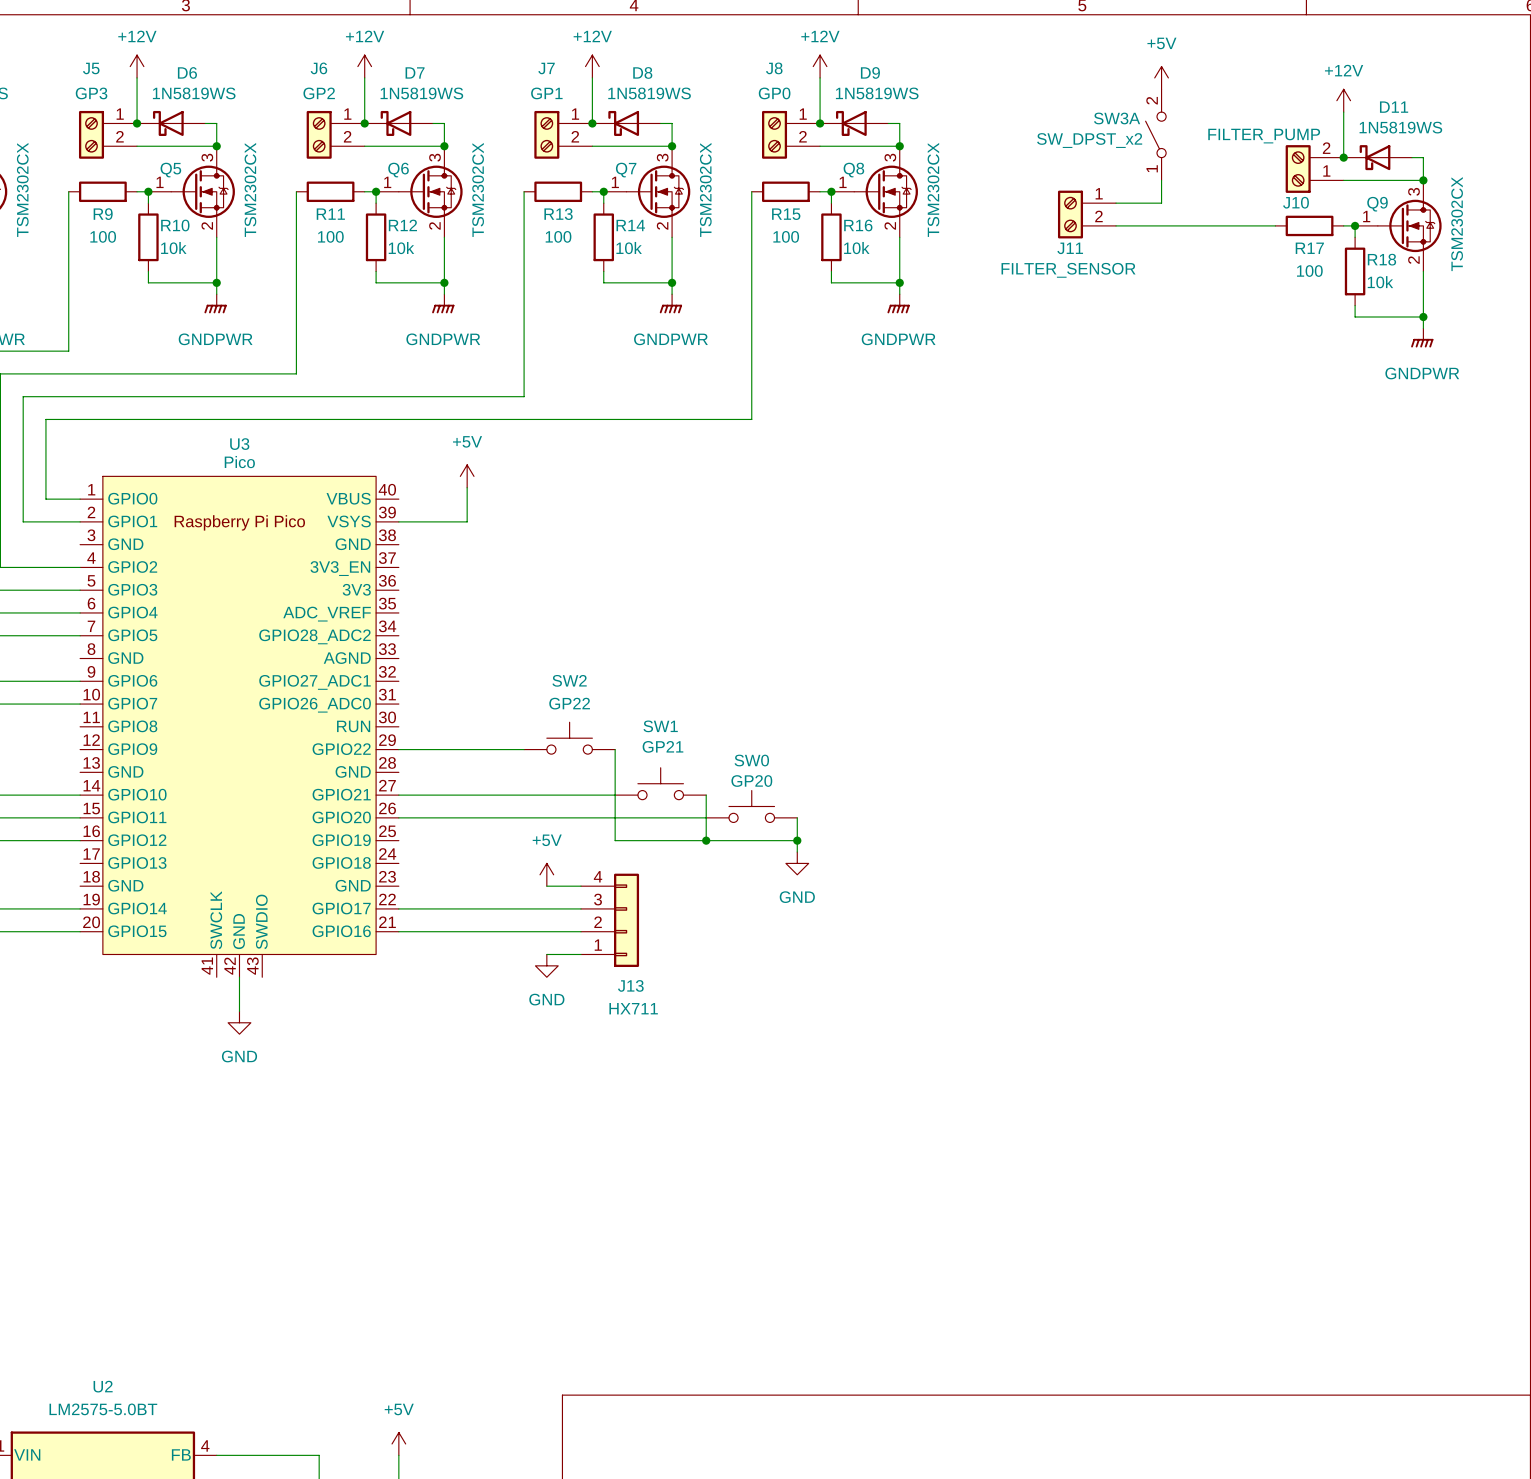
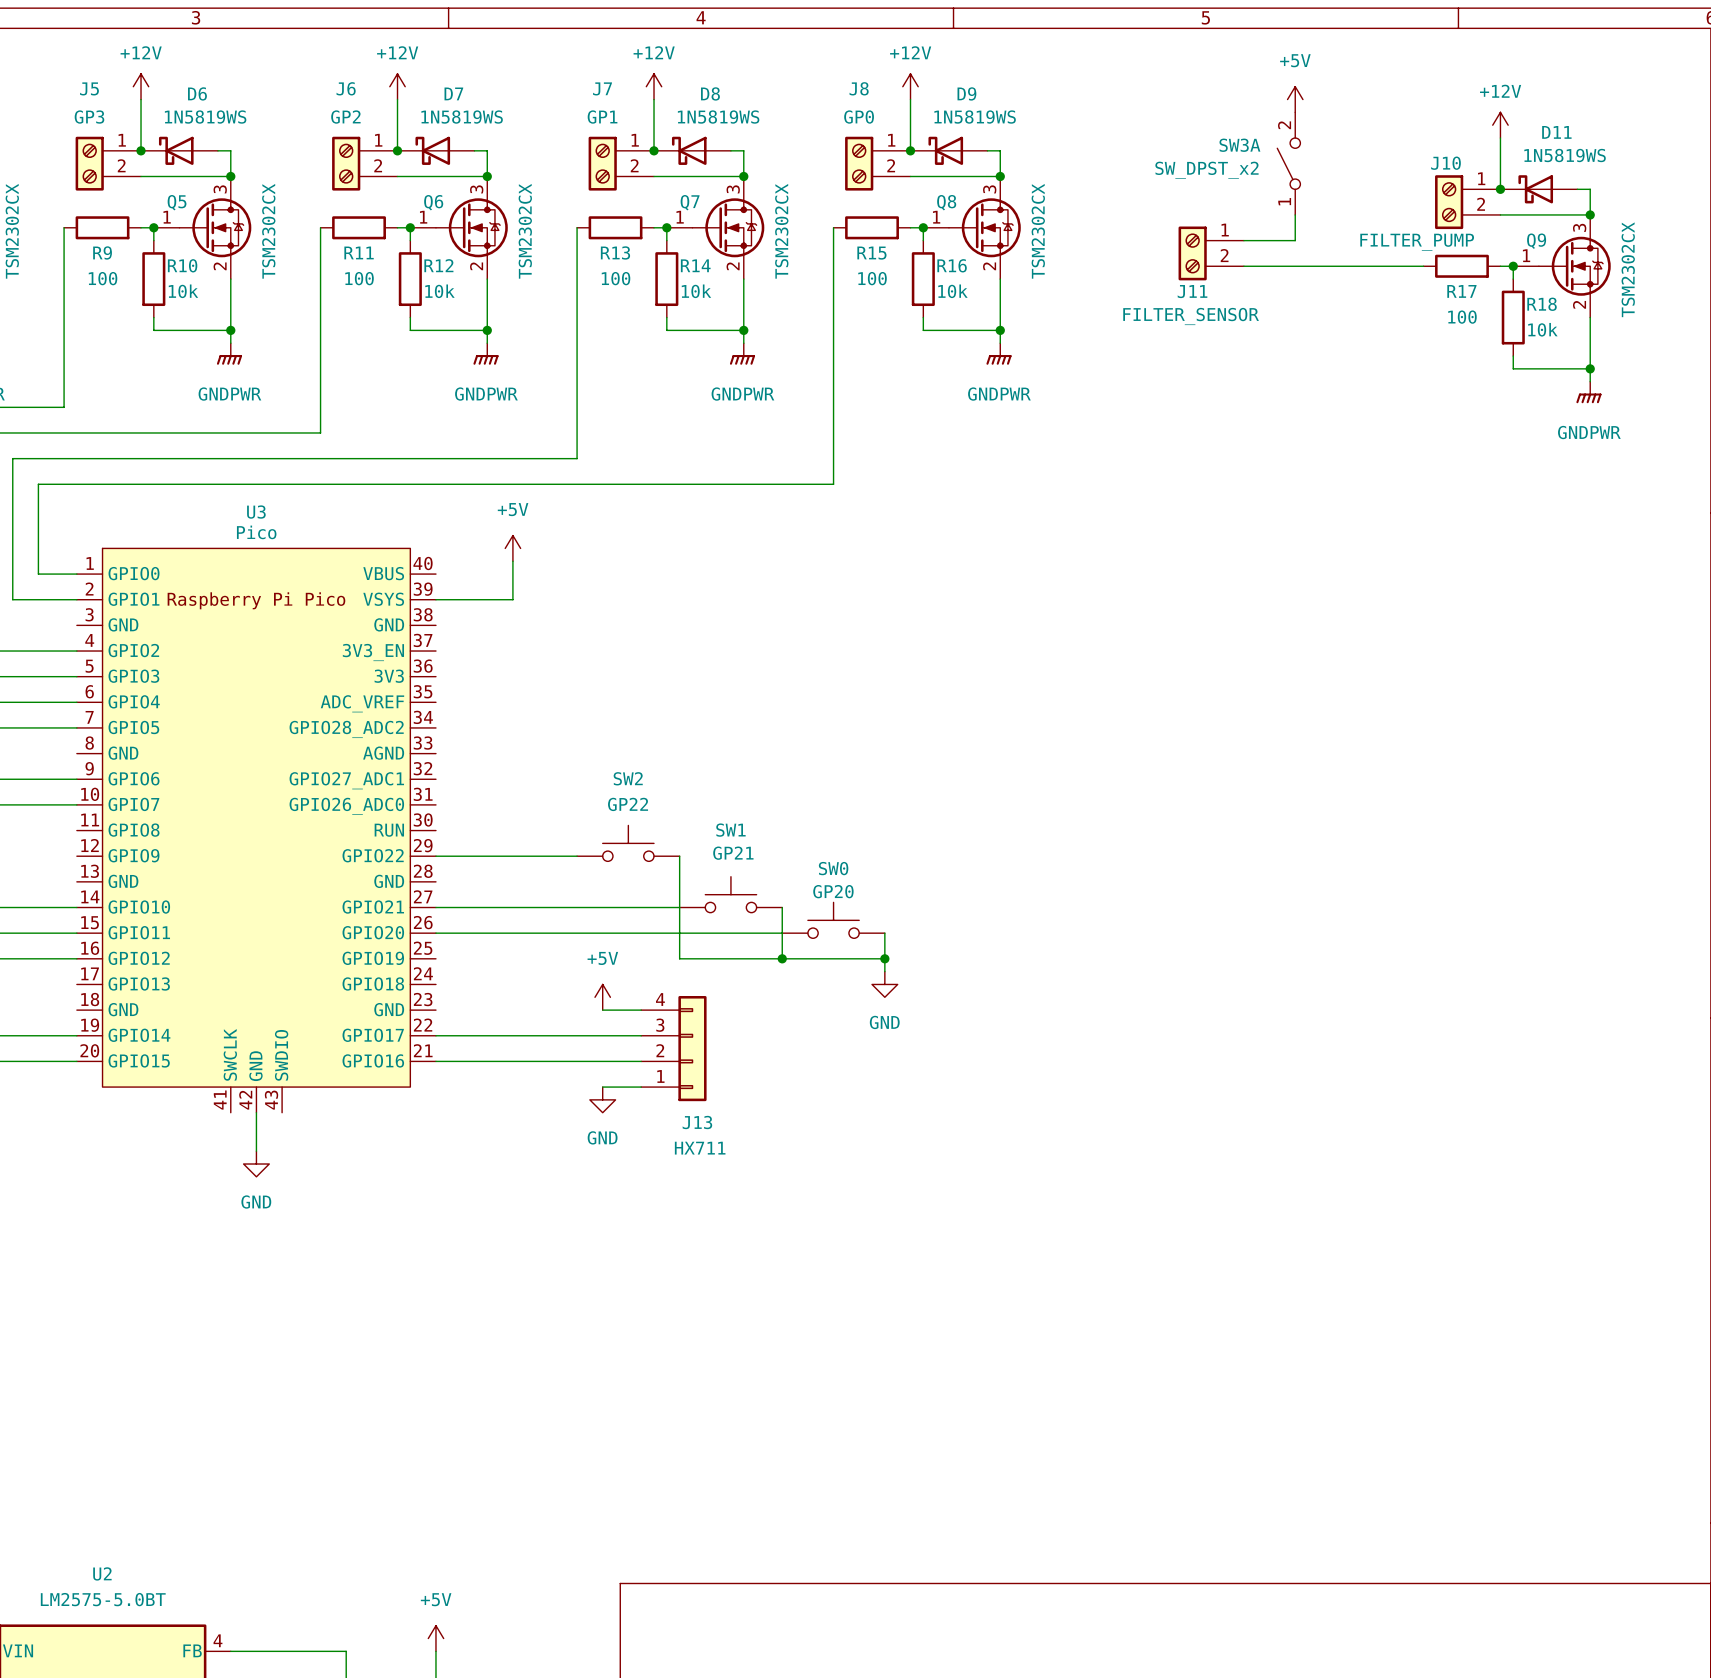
J10 flip: as is (1298, 169) -> up-down (1449, 202)

